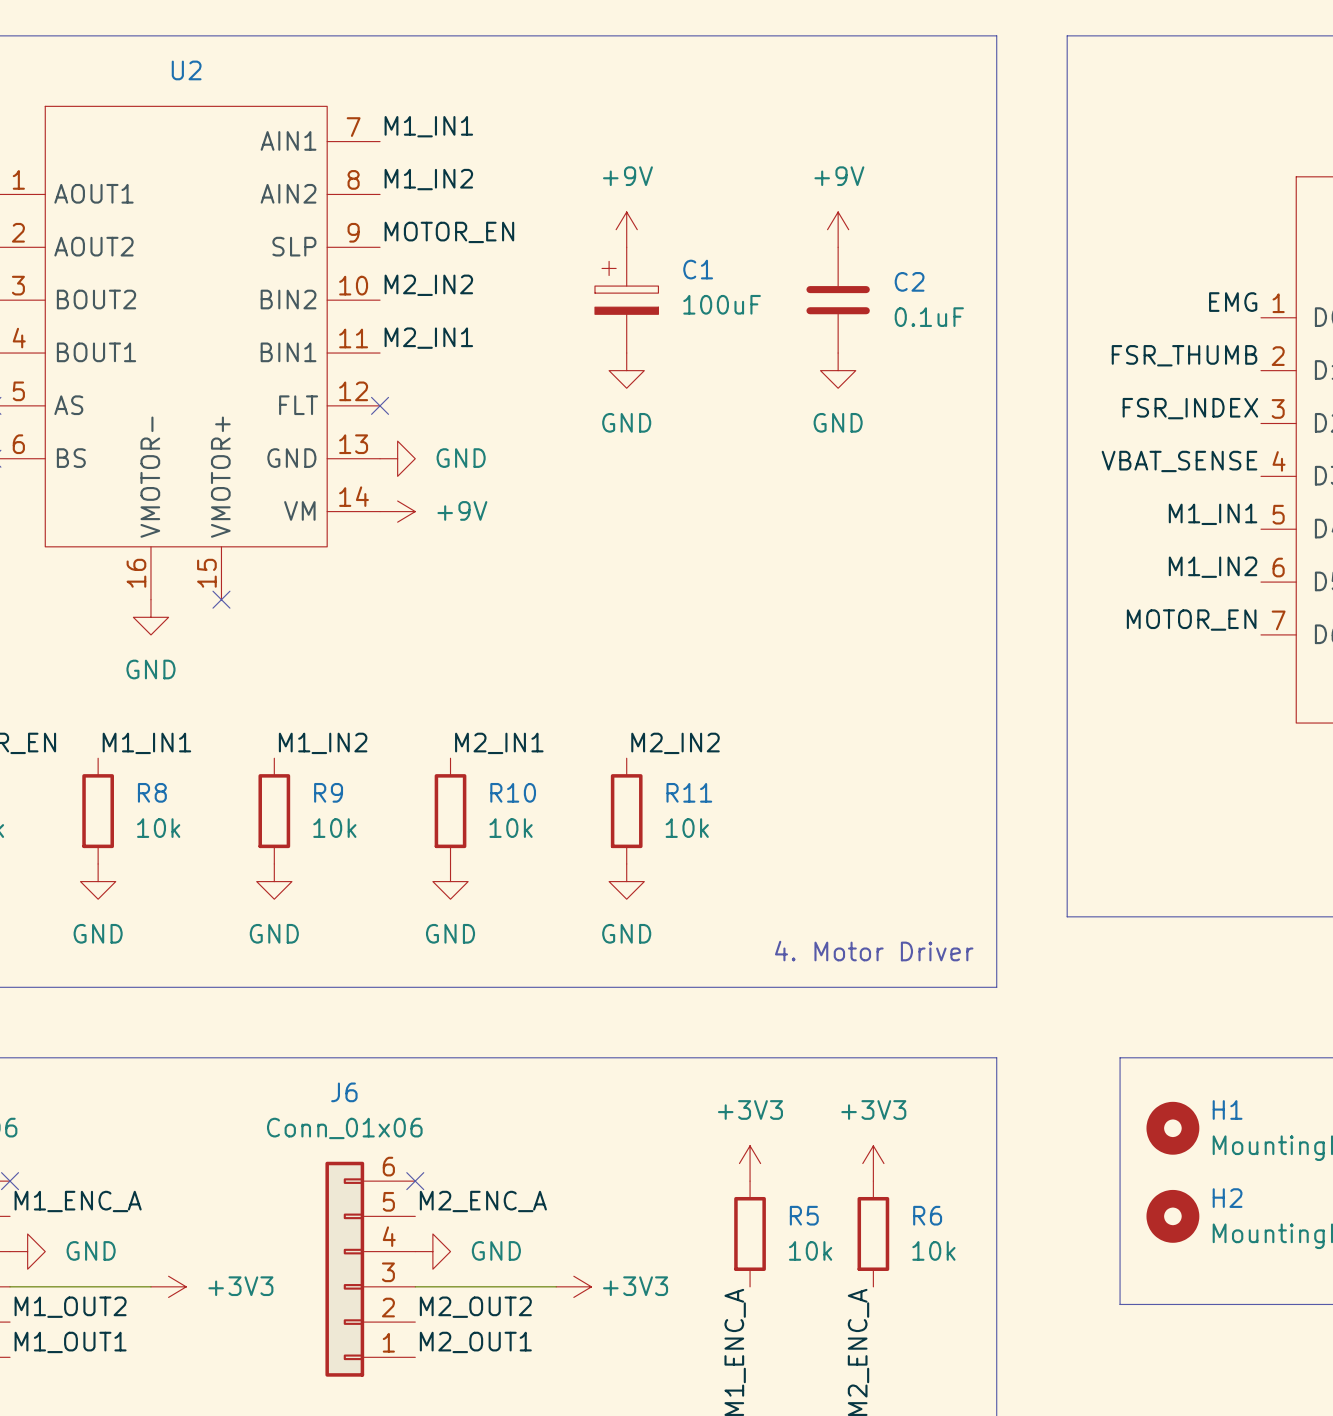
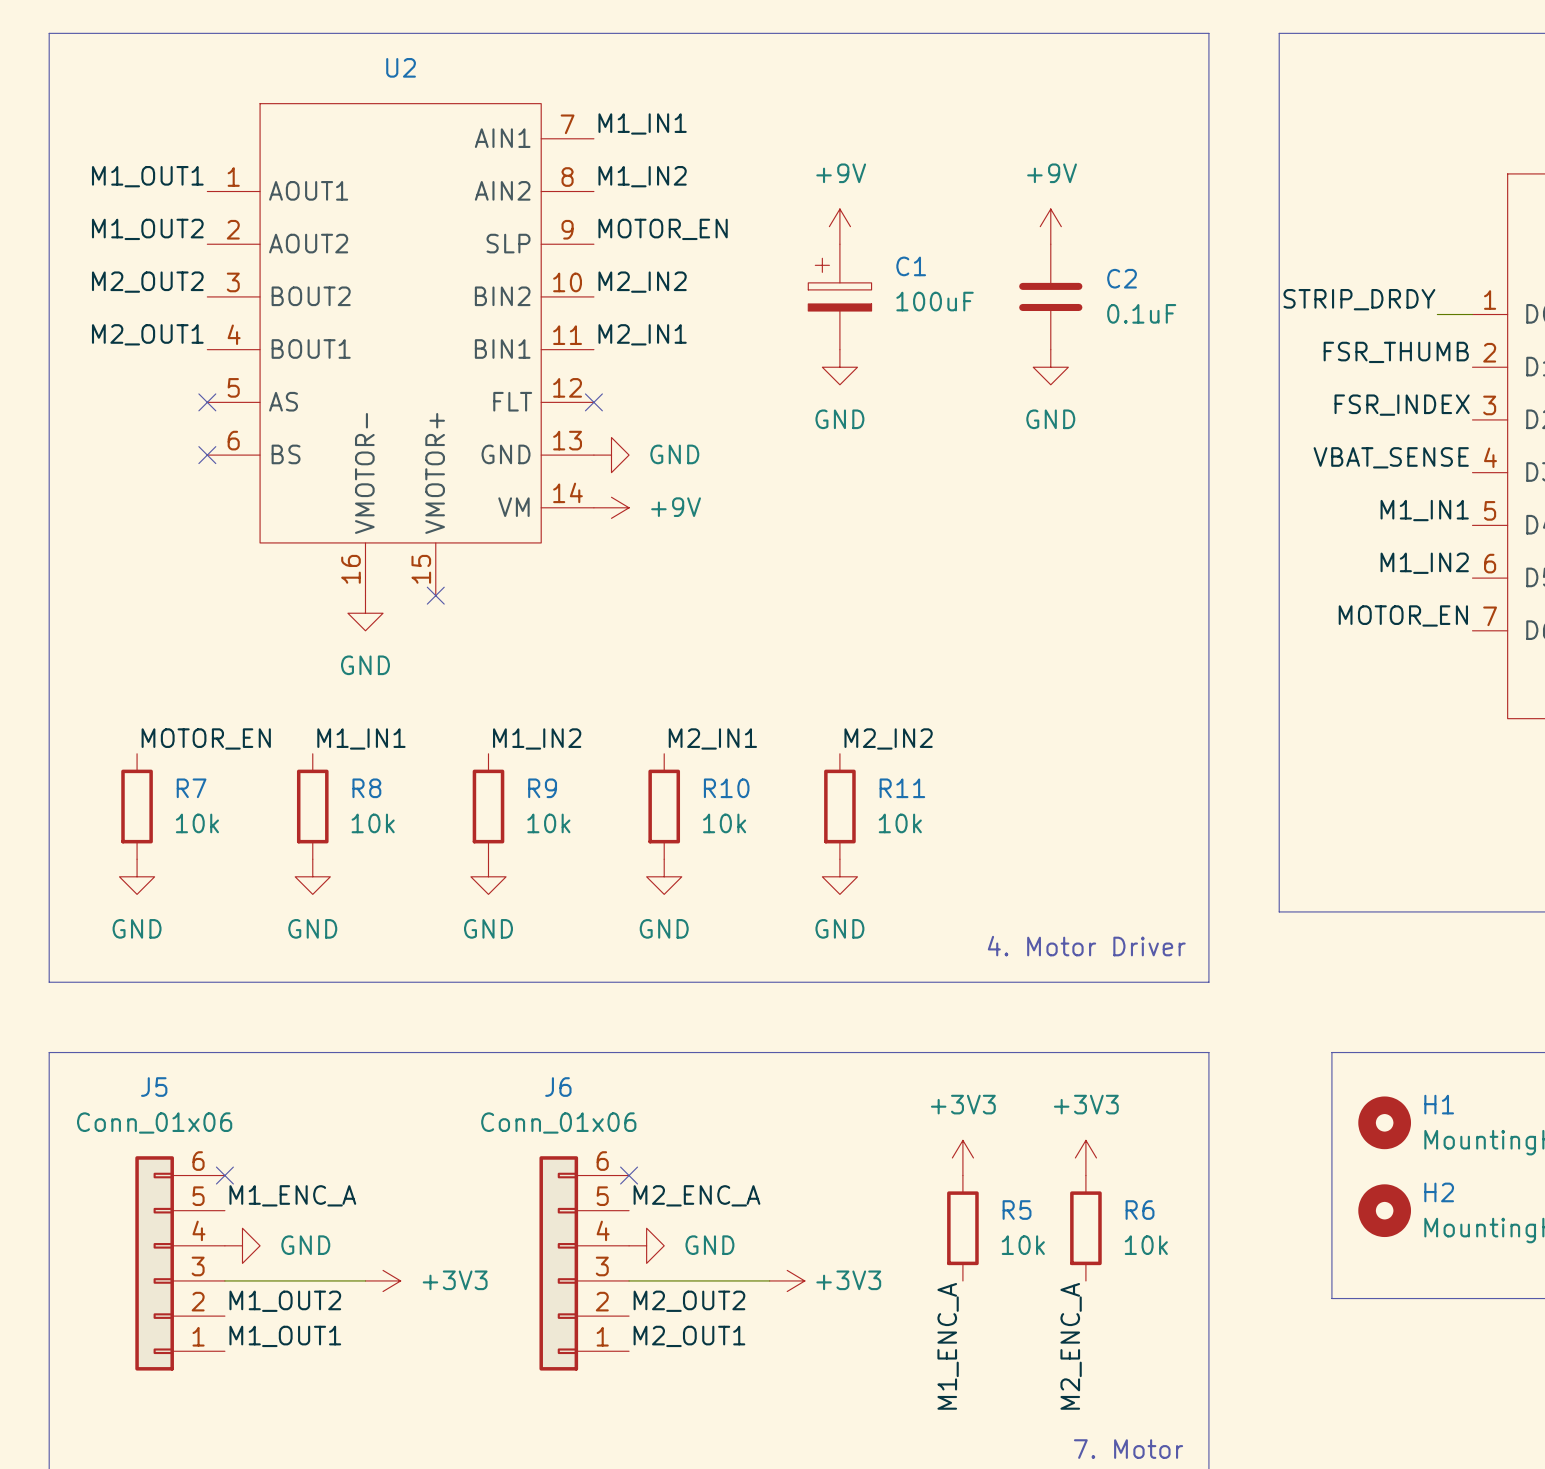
label: none -> STRIP_DRDY (1359, 299)
label: EMG (1233, 302) -> none
wire: none -> (1437, 314) (1472, 314)

